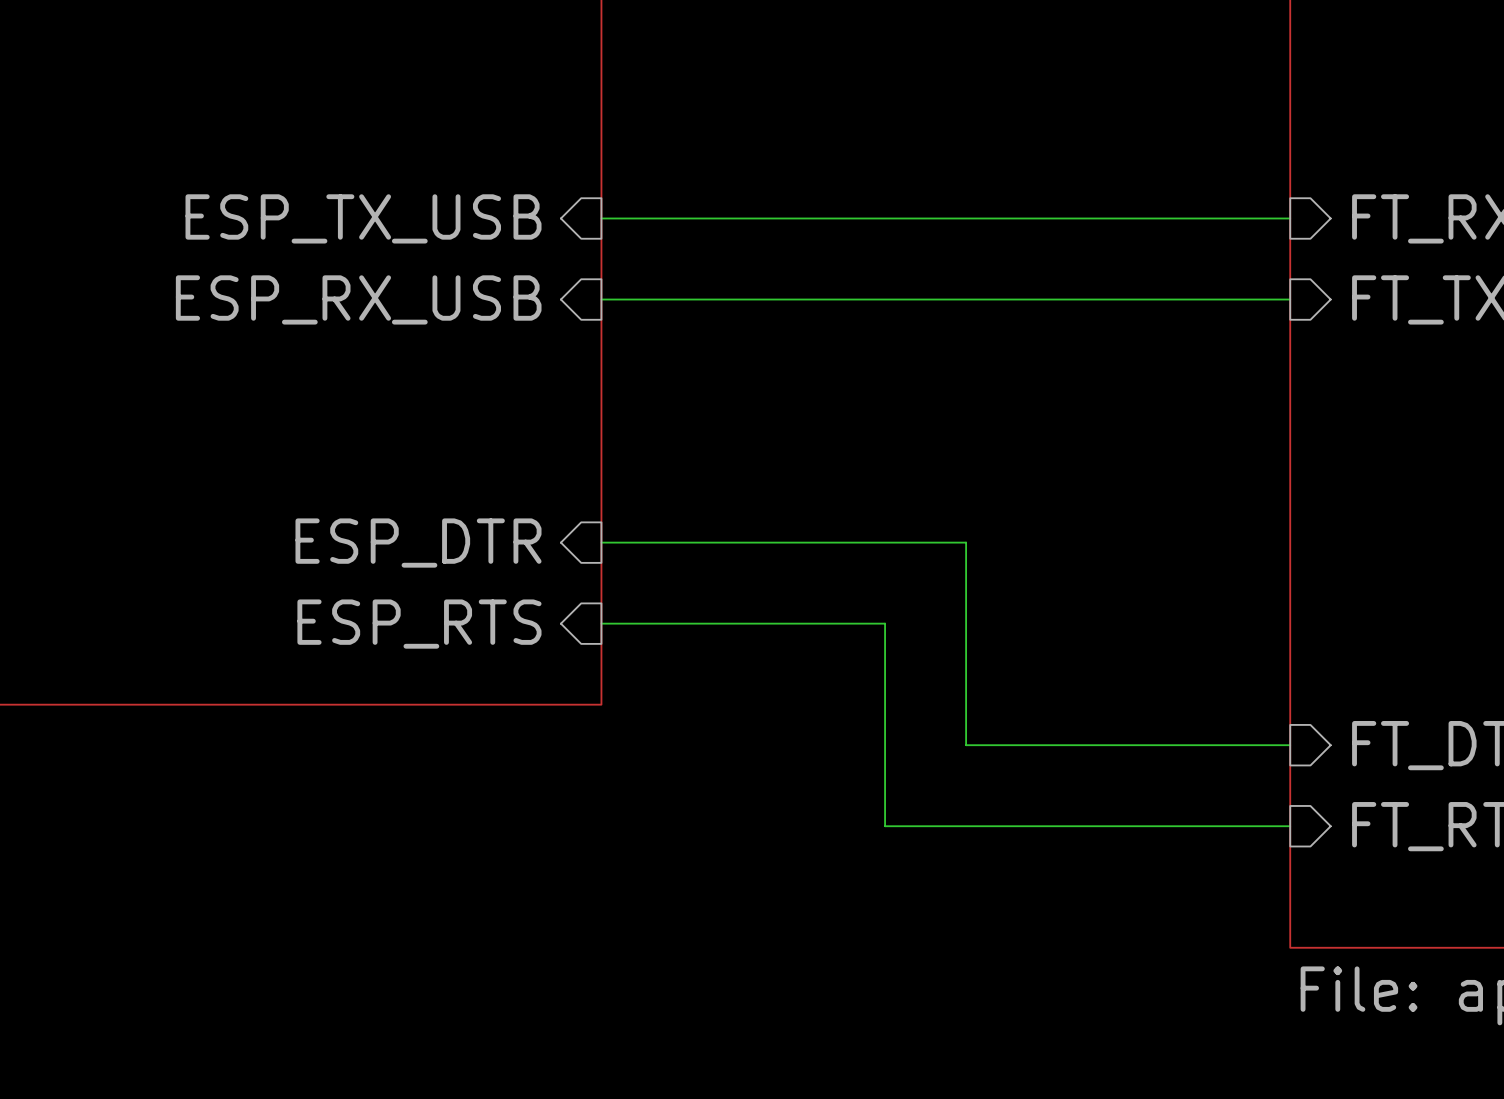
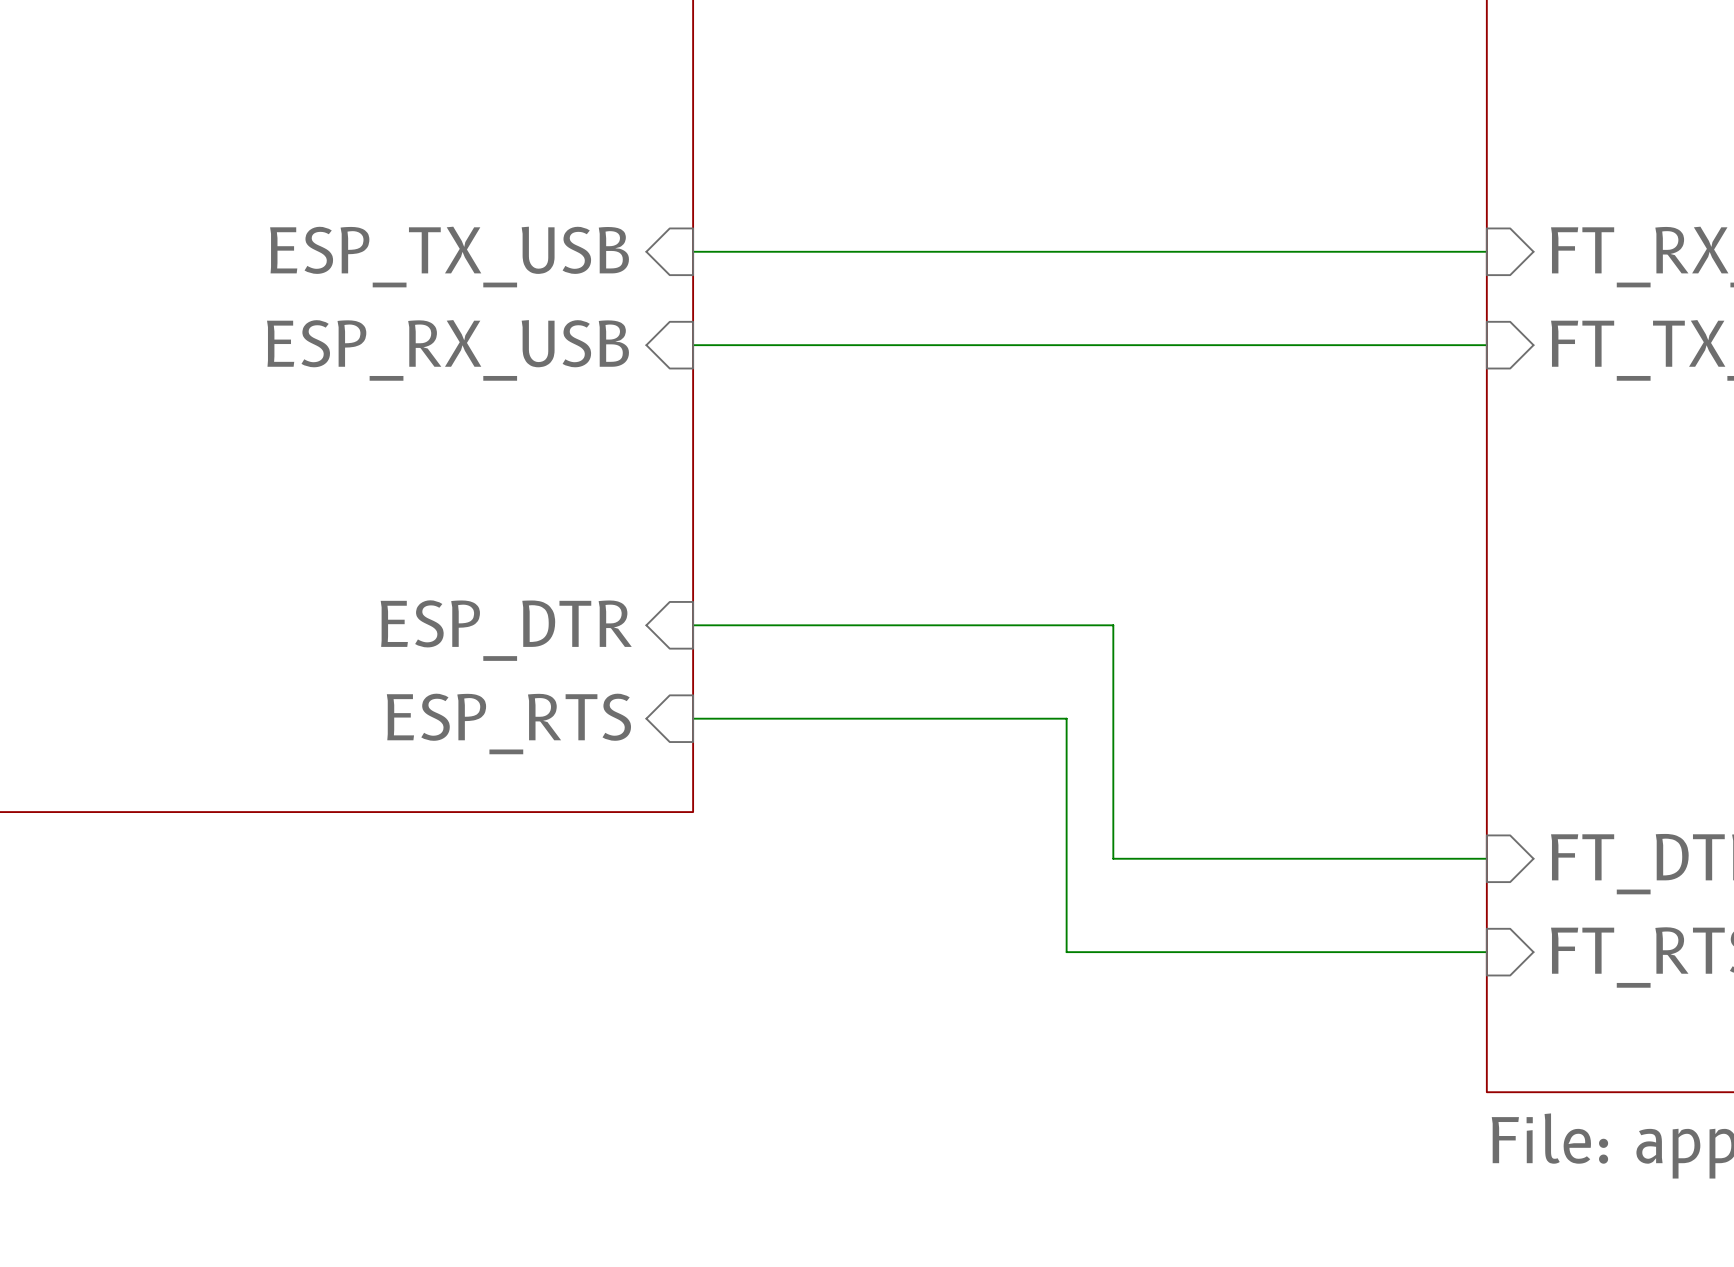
wire: (885, 623) (885, 826) (925, 826) -> (1019, 718) (1066, 718) (1066, 952)

